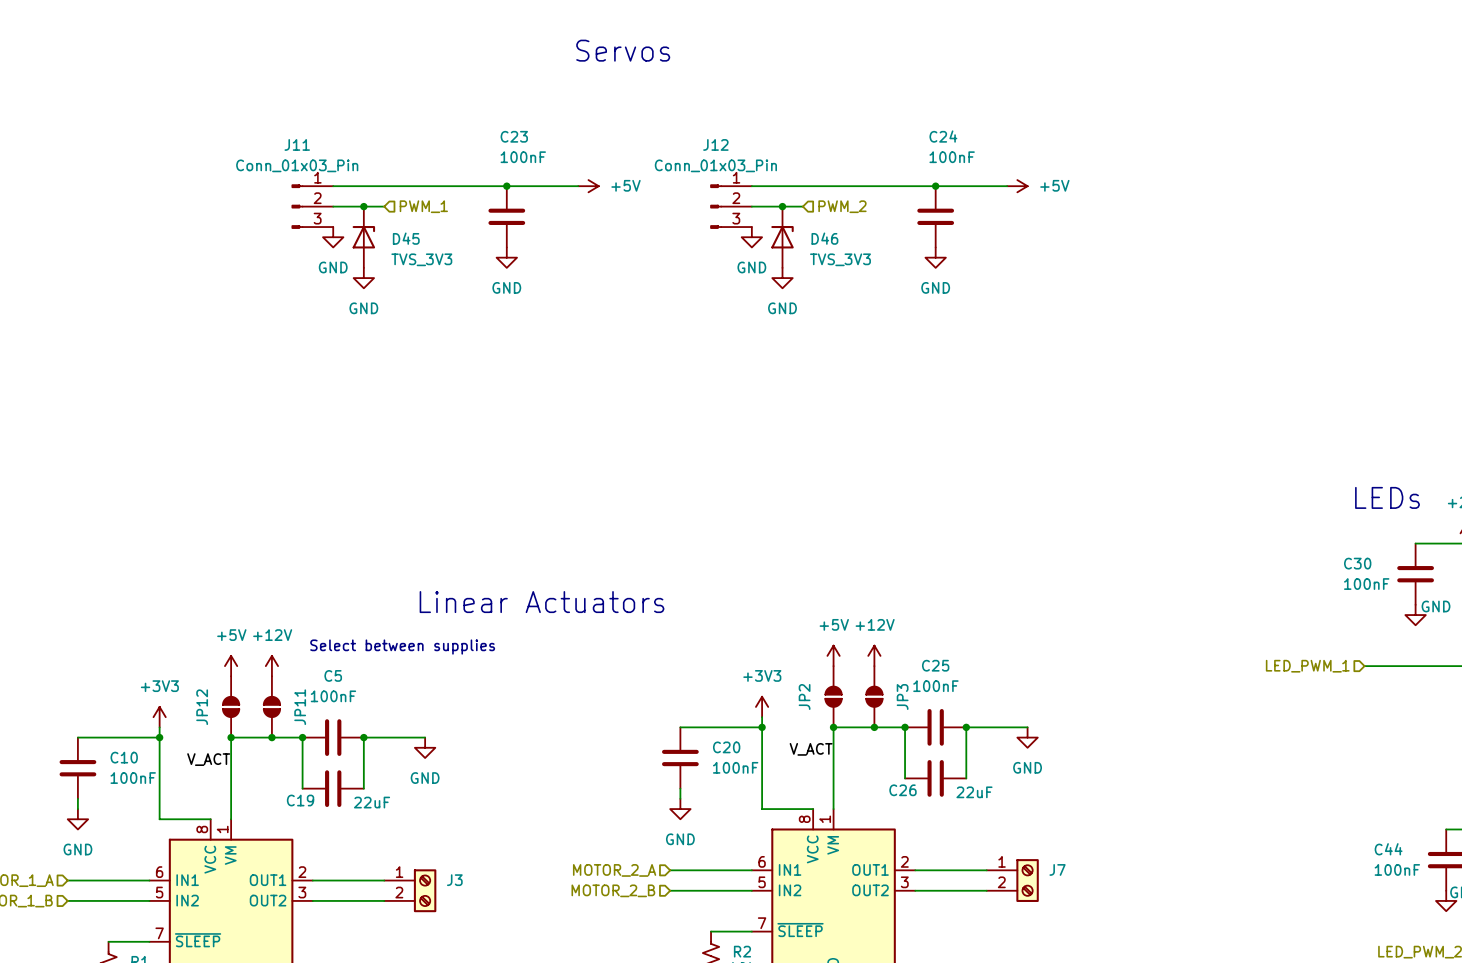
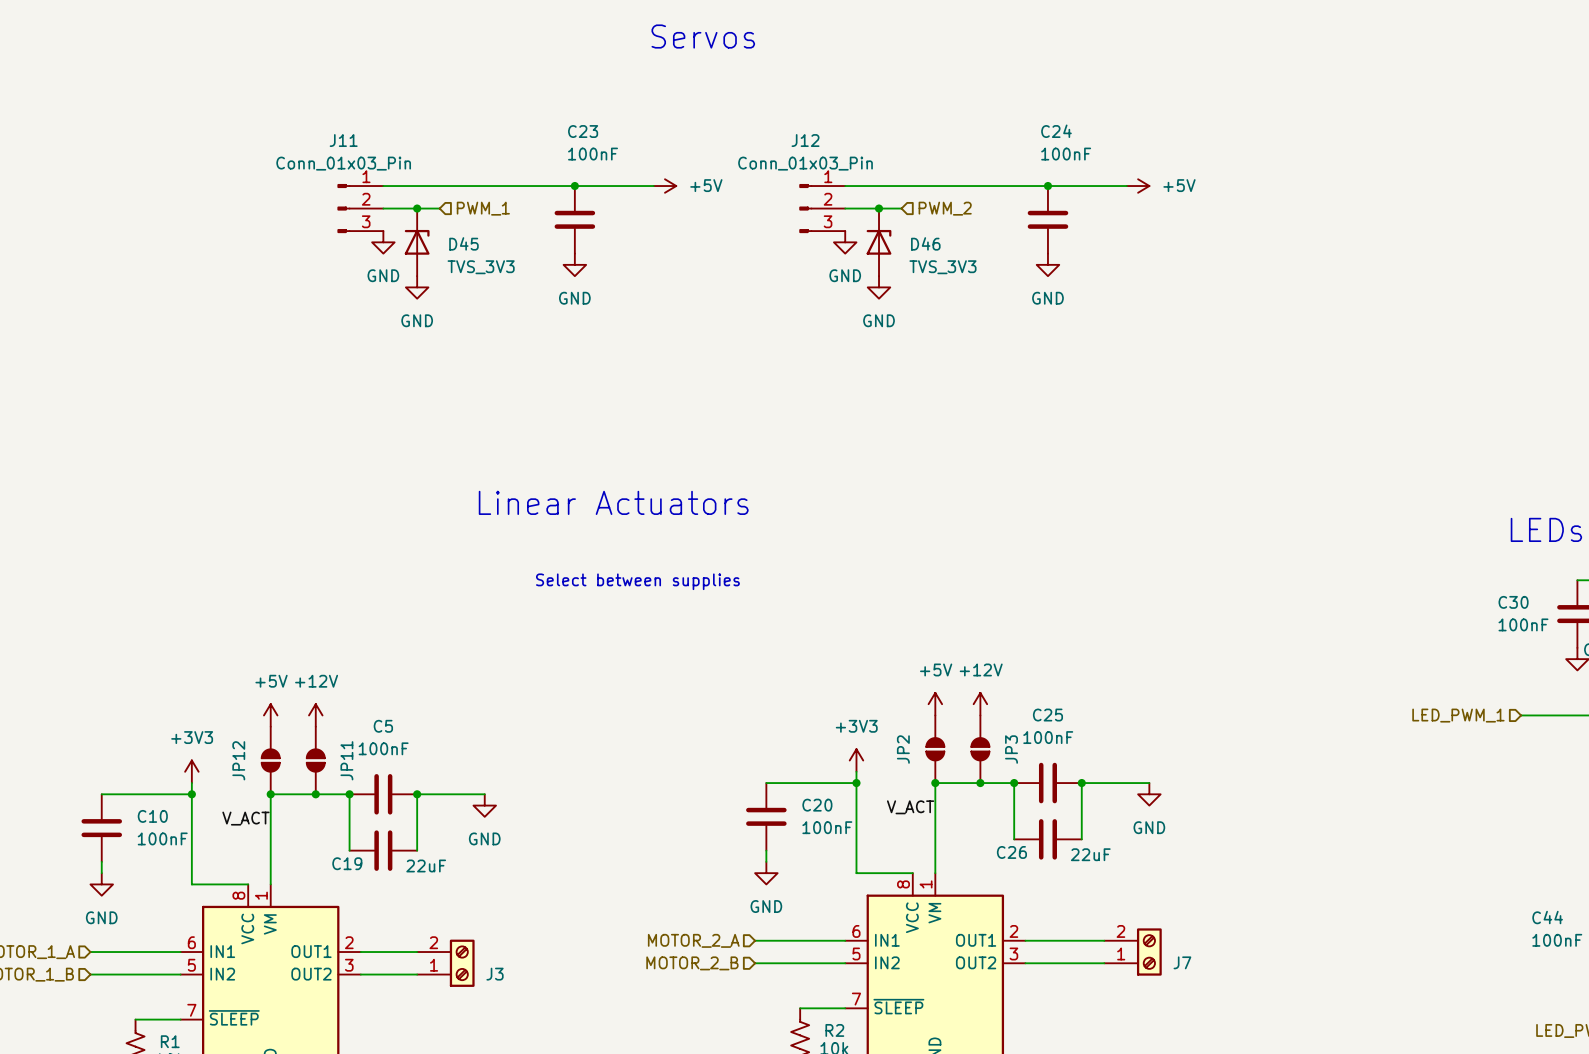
text position: Linear Actuators (542, 602) -> Linear Actuators (613, 502)
text position: Select between supplies (402, 647) -> Select between supplies (637, 581)
J7 flip: as is (1027, 880) -> up-down (1149, 952)
J3 flip: as is (425, 890) -> up-down (462, 963)

